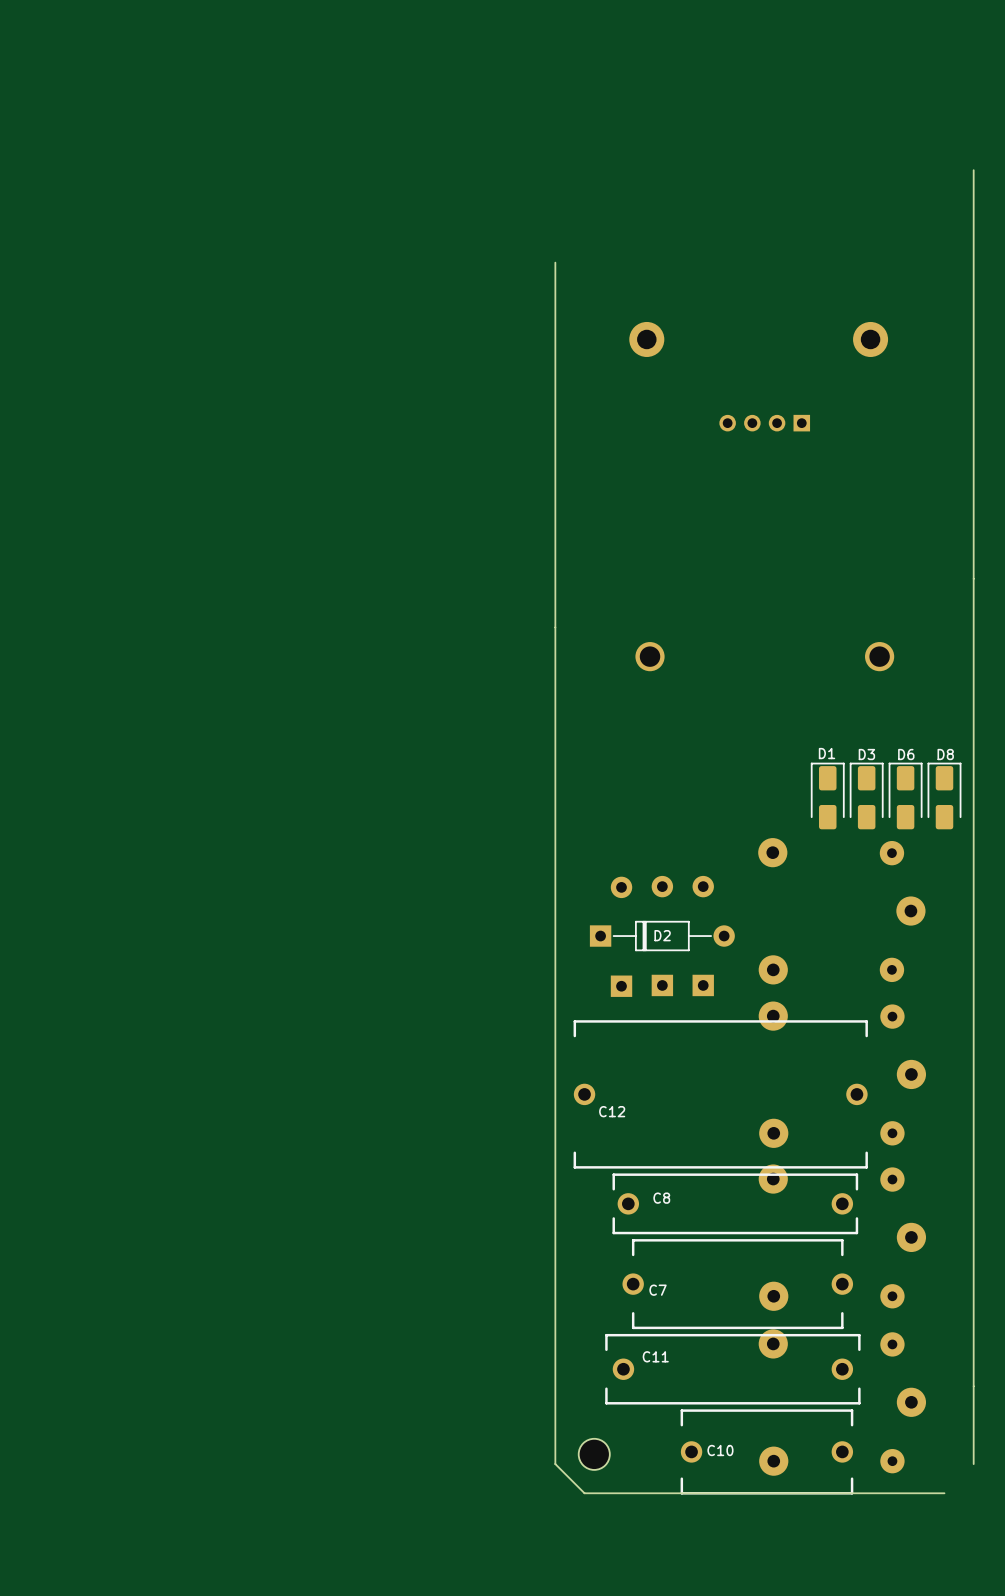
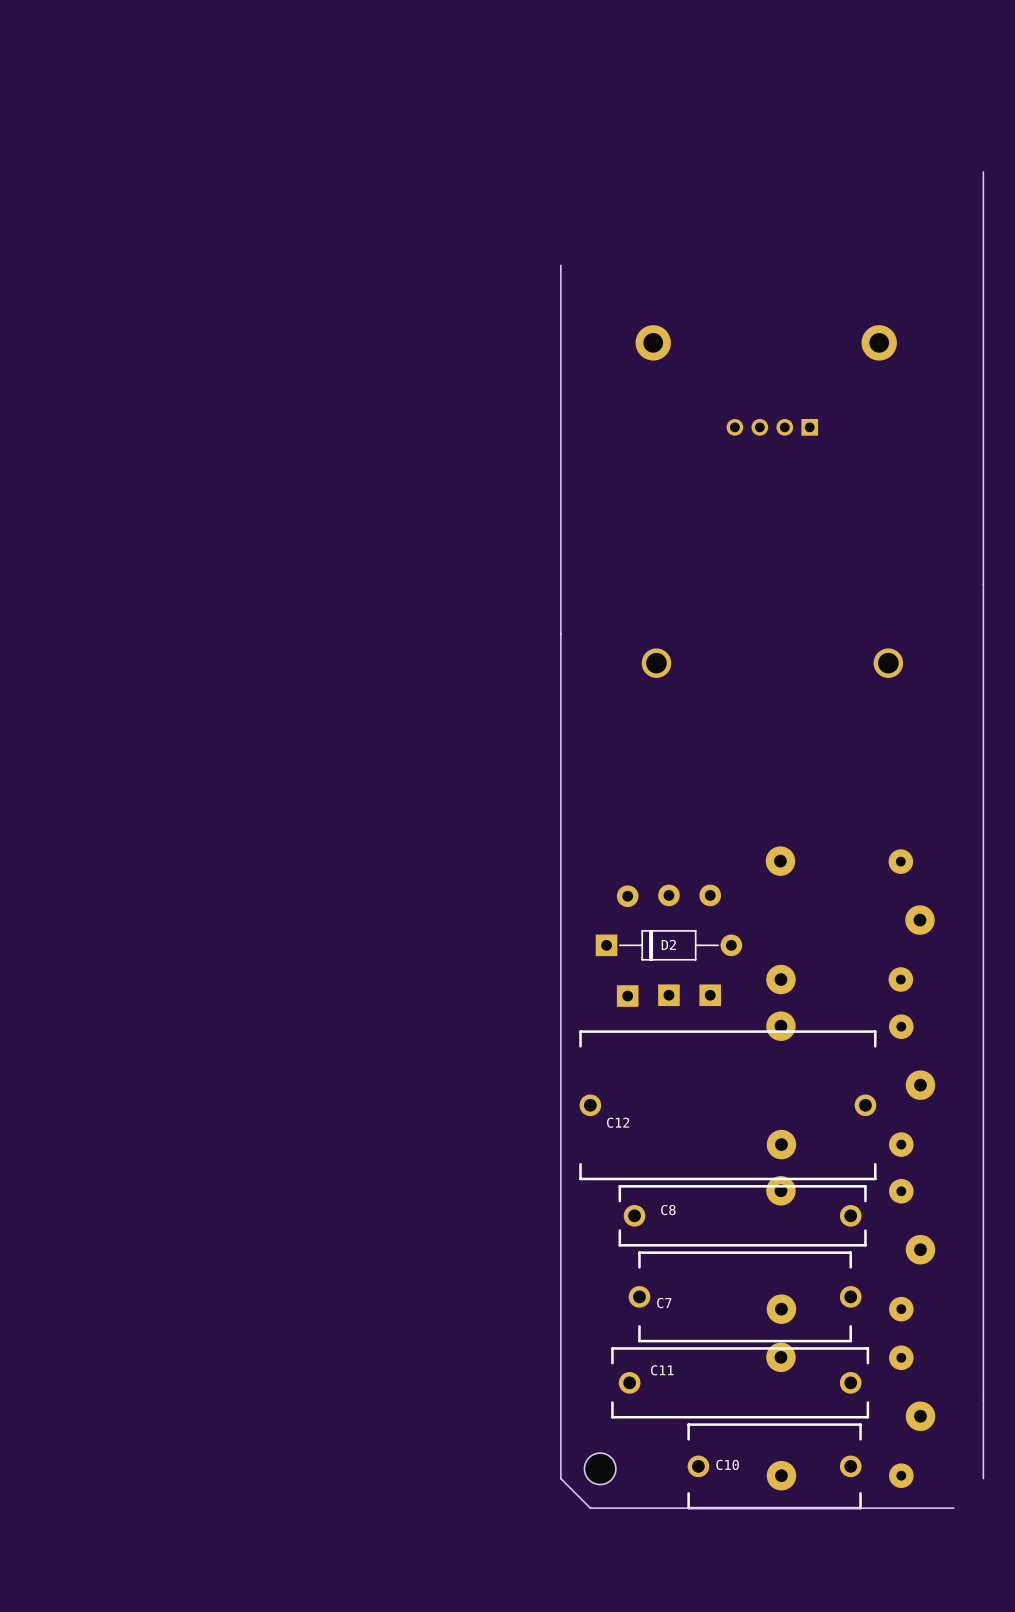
D1: (827, 796) -> none
D3: (866, 796) -> none
D6: (905, 796) -> none
D8: (944, 796) -> none

